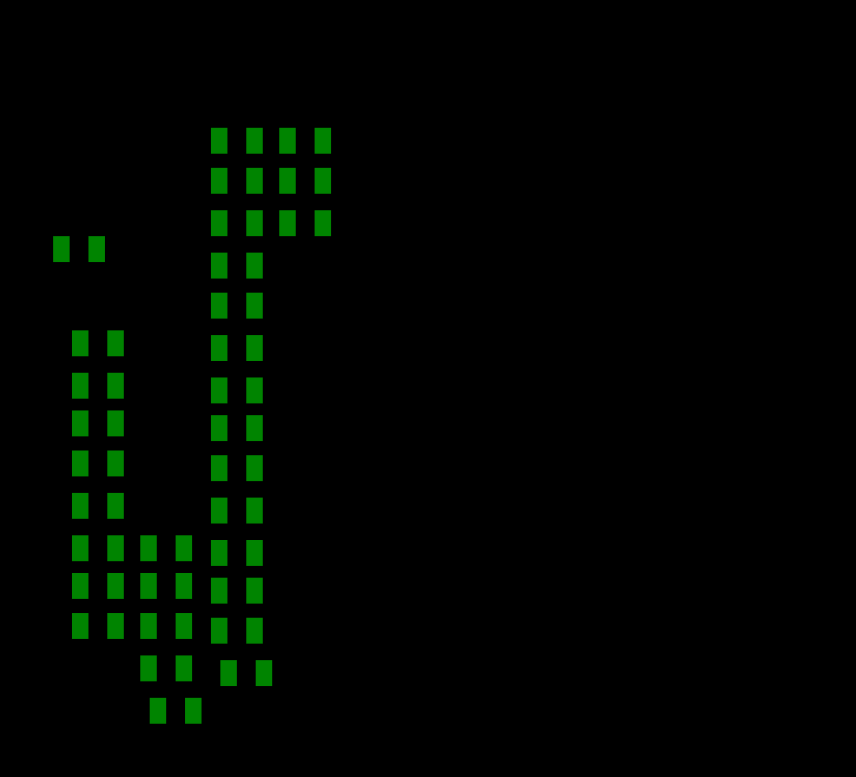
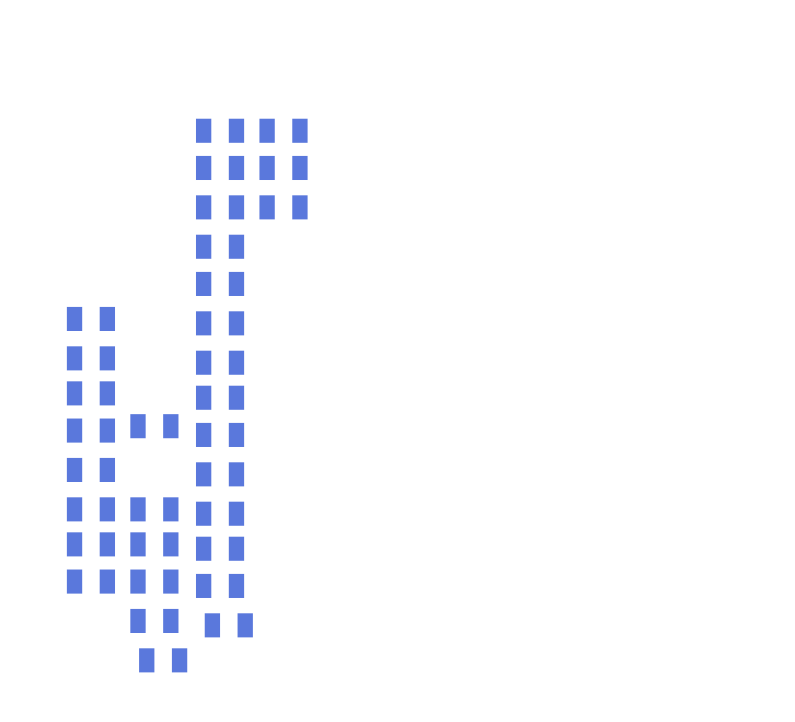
part position: (79, 249) -> (154, 426)

